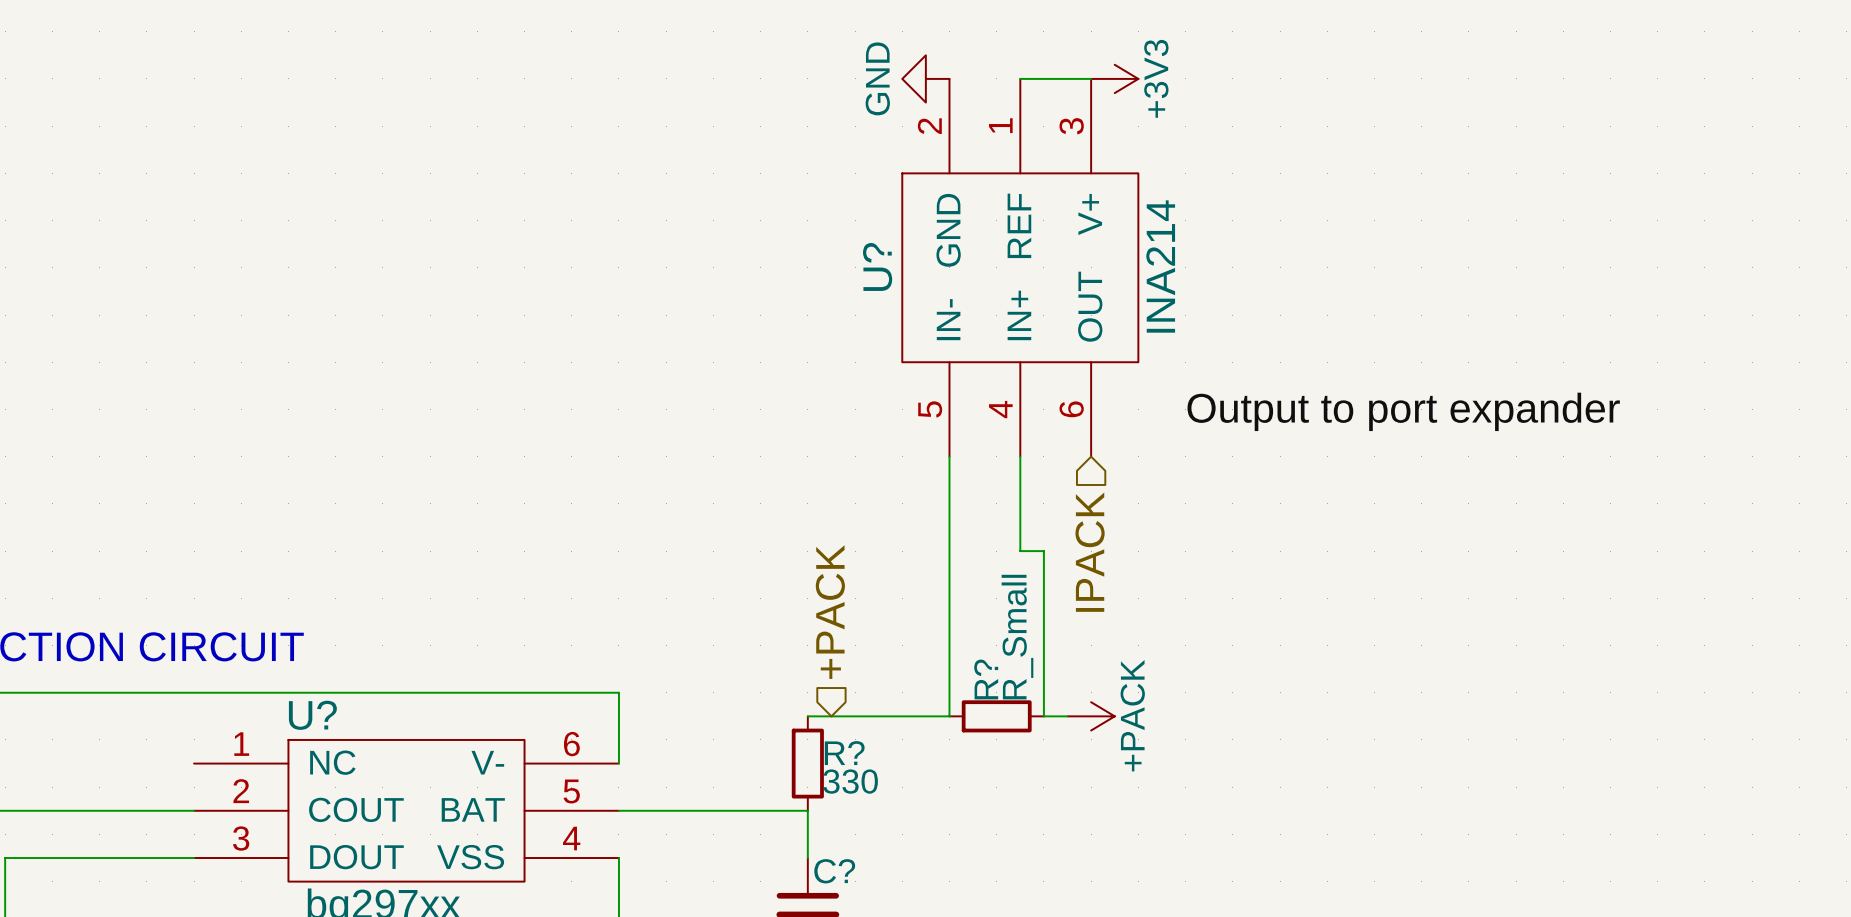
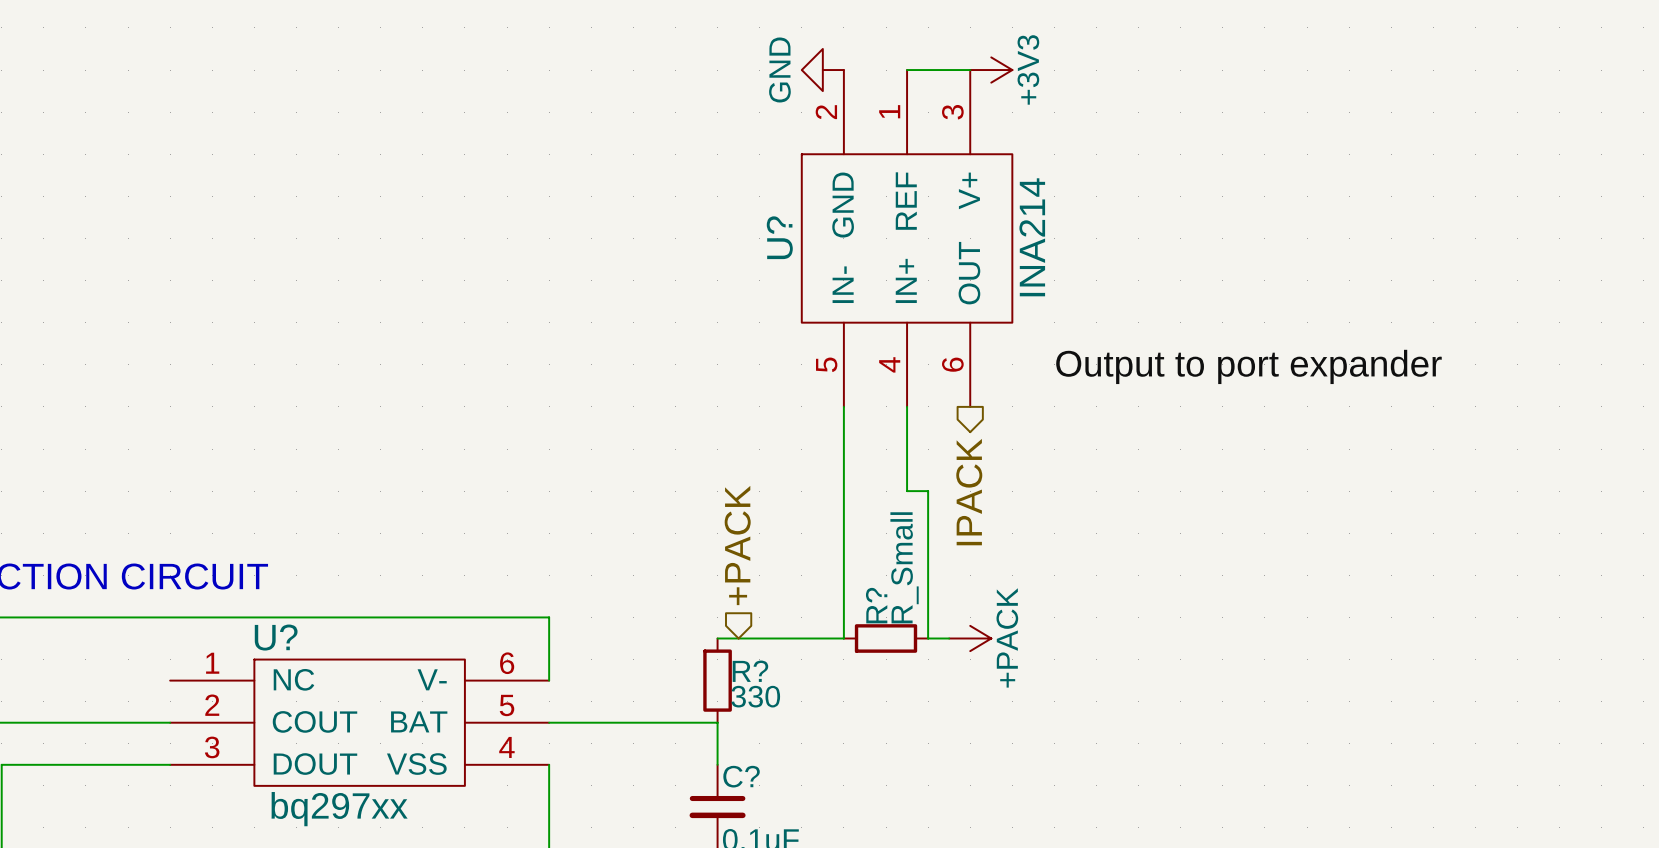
hierarchical label shape: input (1090, 552) -> output (969, 492)

